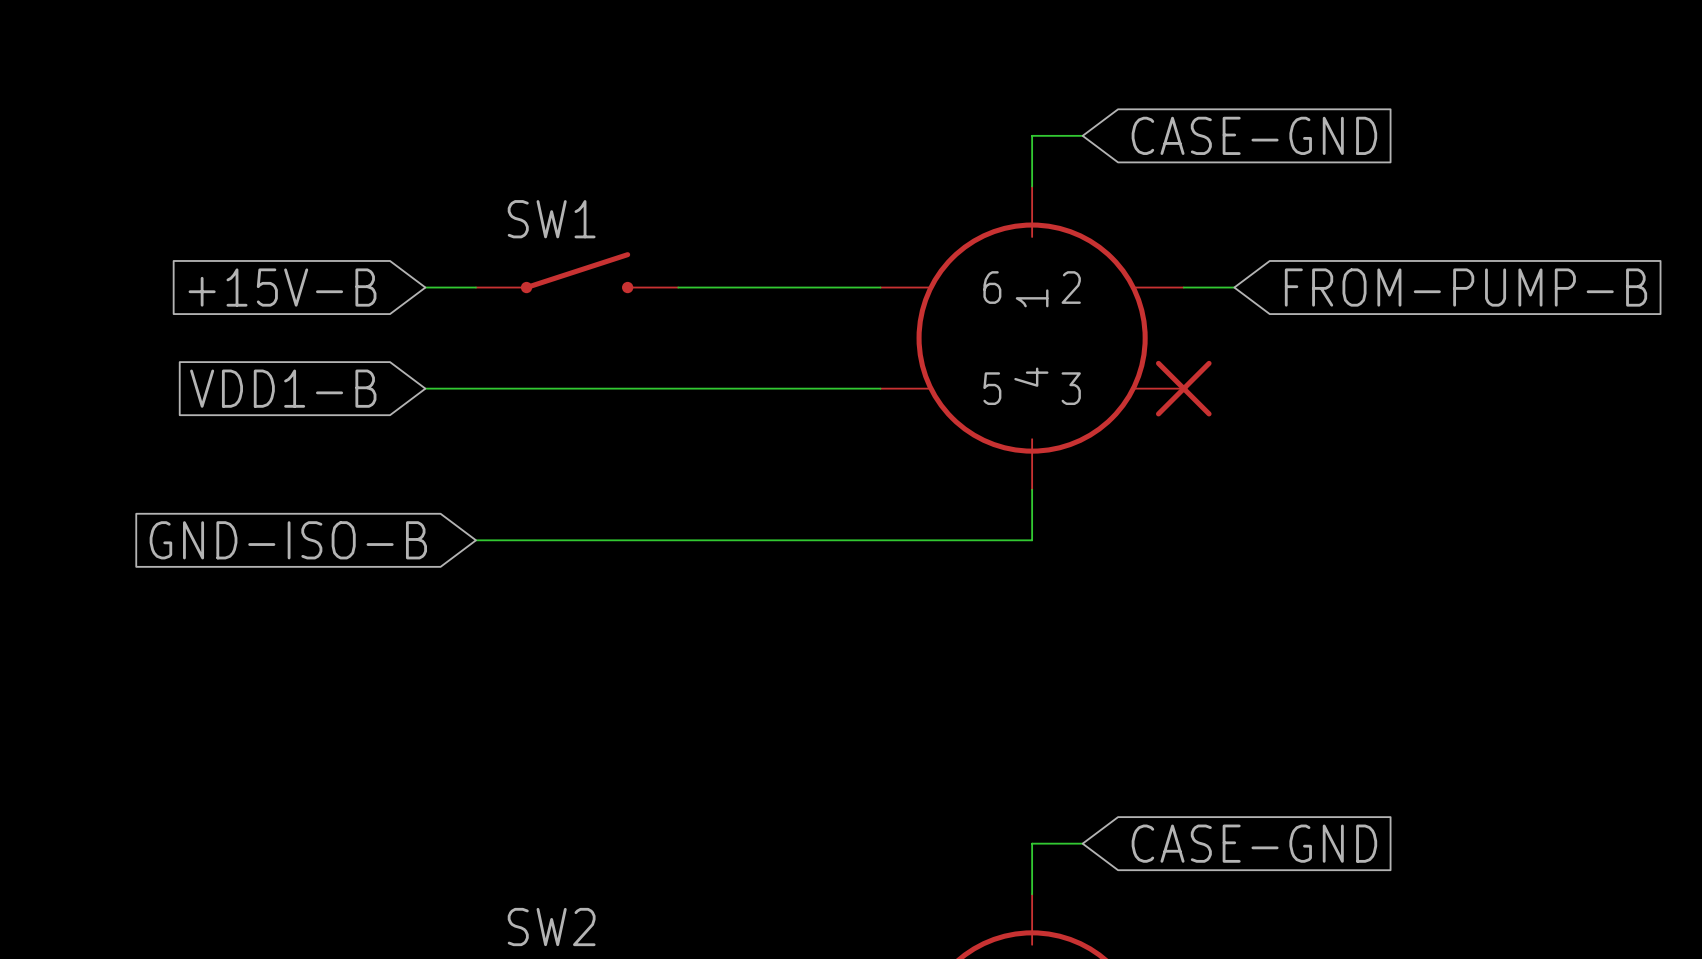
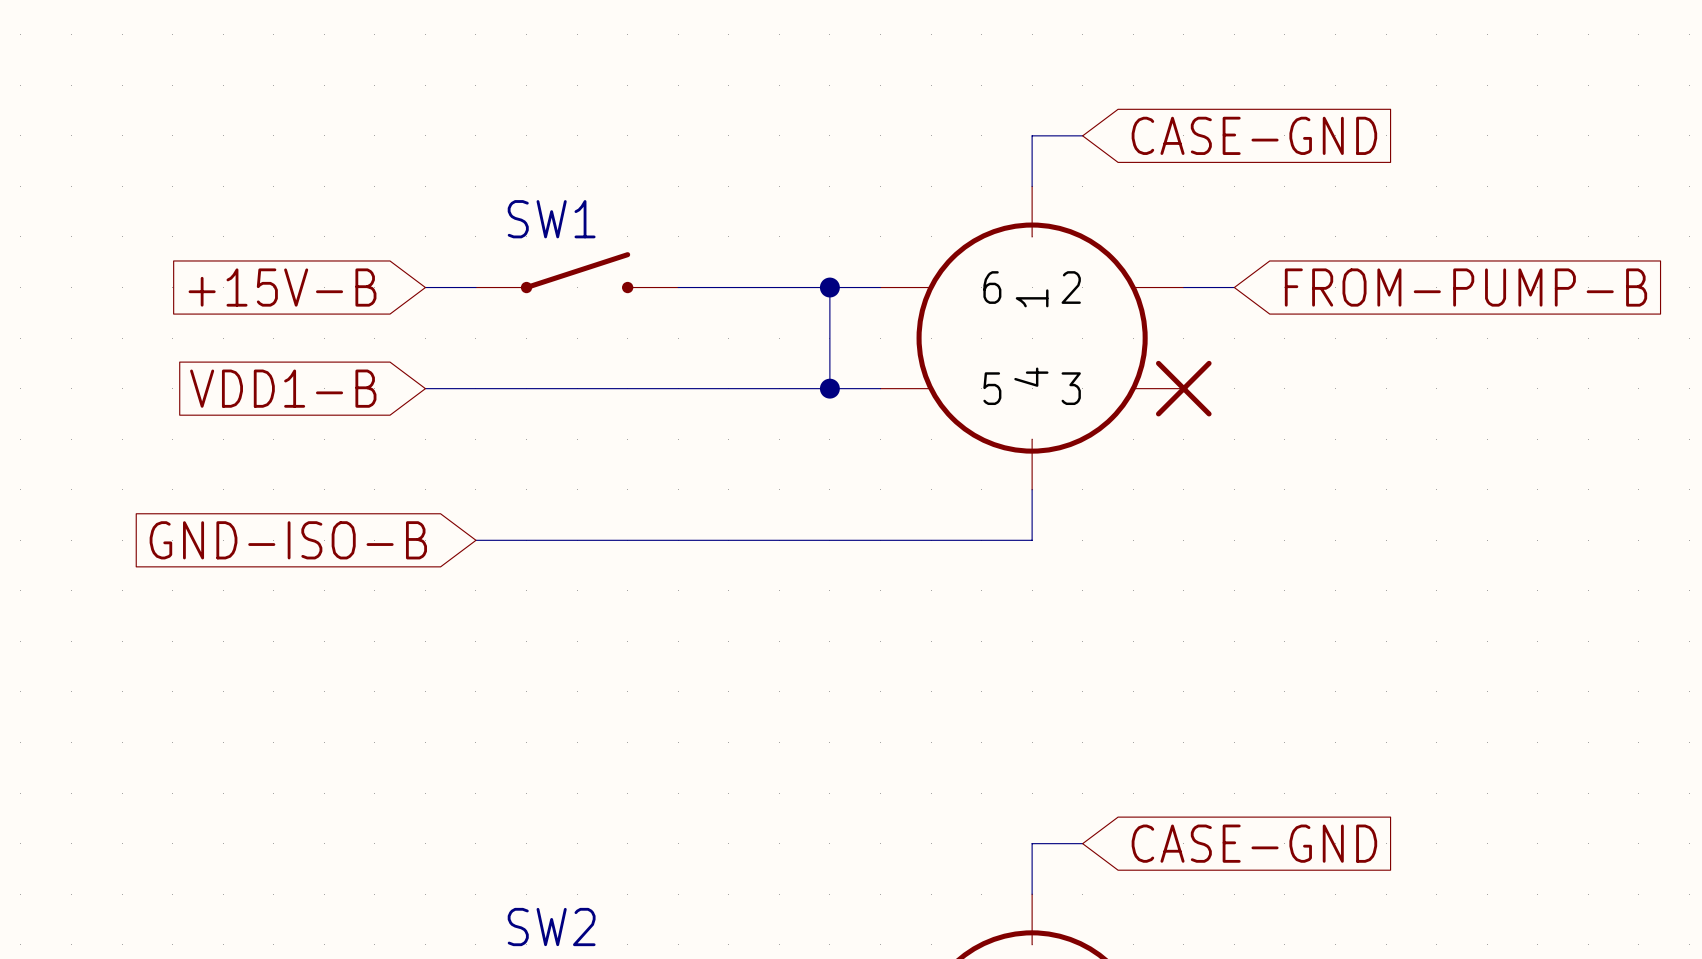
wire: none -> (829, 287) (829, 388)
junction: none -> (829, 287)
junction: none -> (829, 388)

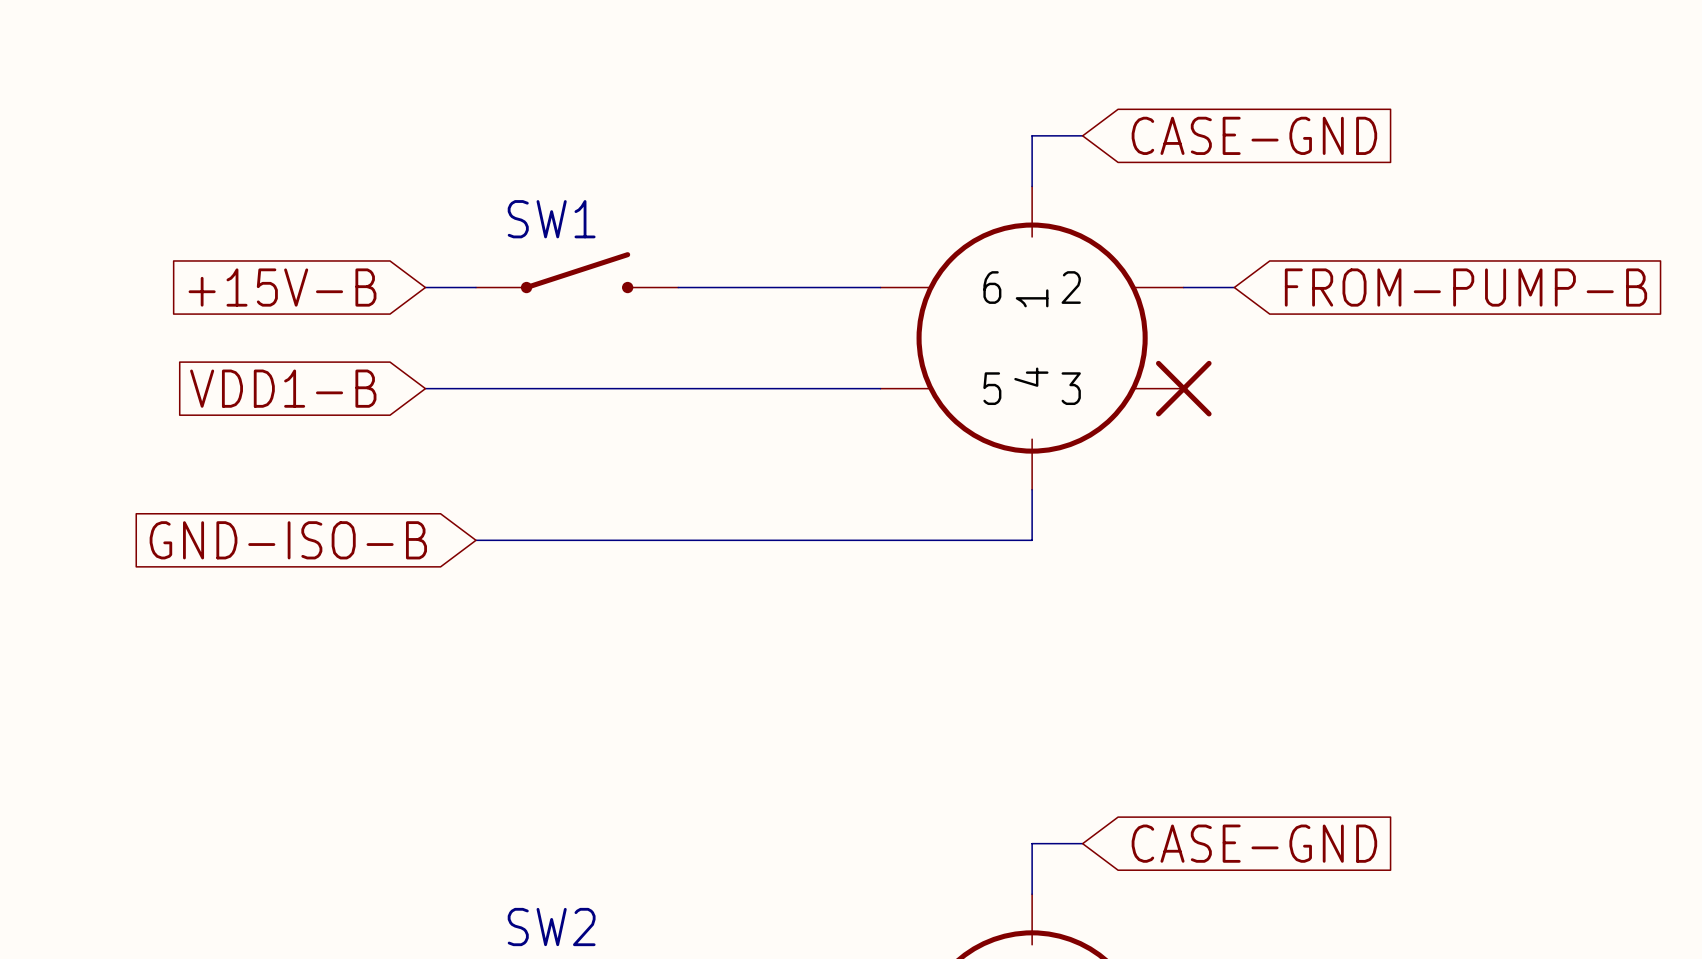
wire: (829, 287) (829, 388) -> none
junction: (829, 287) -> none
junction: (829, 388) -> none

